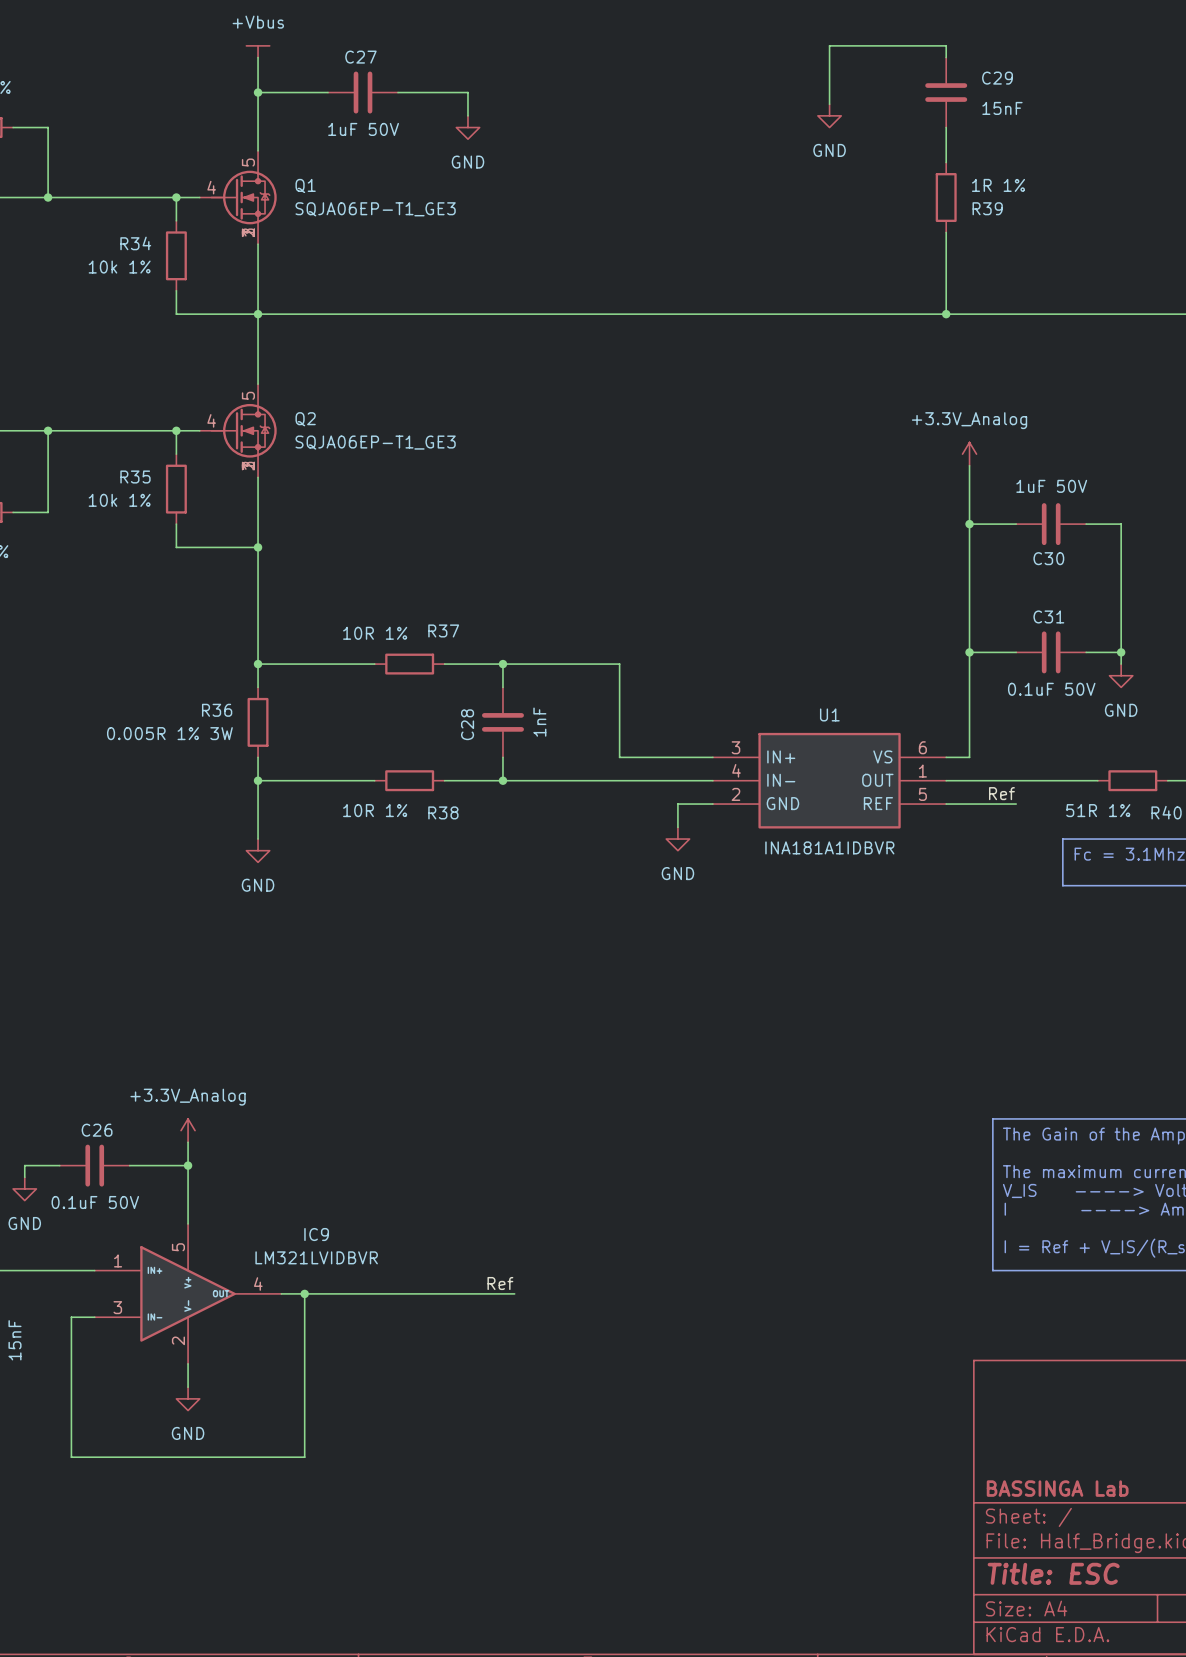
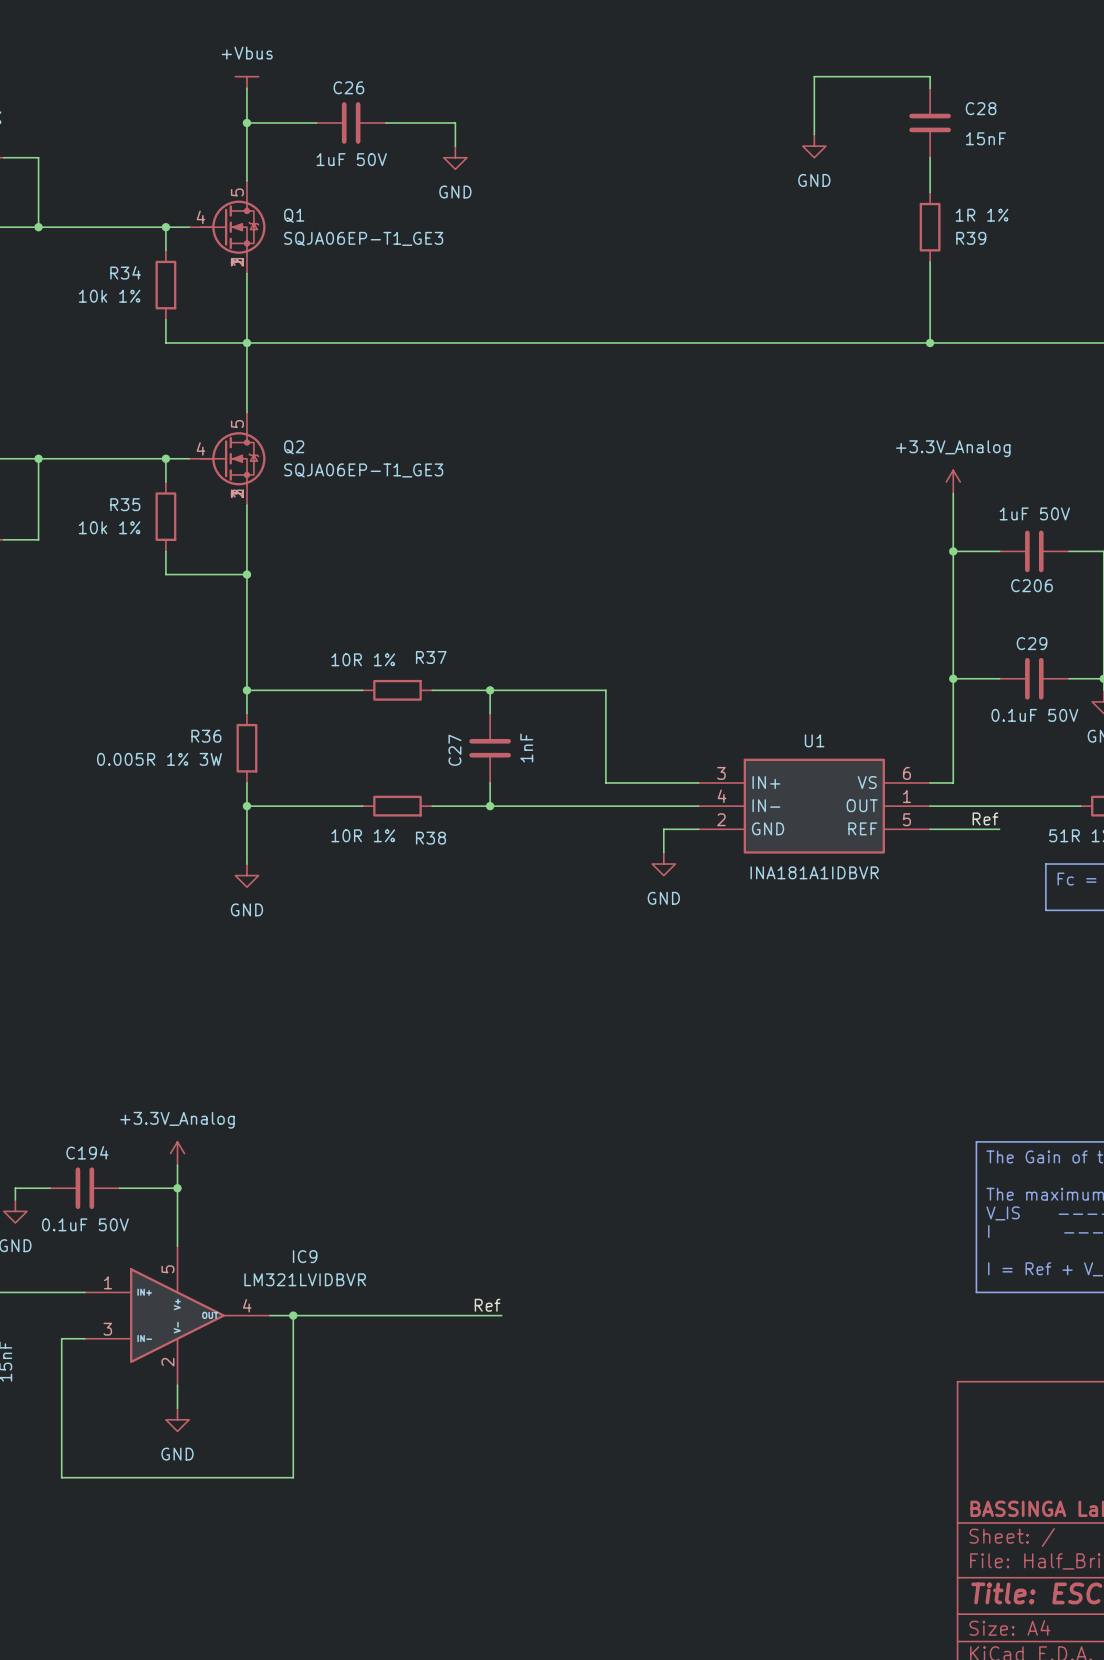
C27 name: C27 (360, 57) -> C26 (348, 87)
C29 name: C29 (997, 78) -> C28 (981, 108)
C30 name: C30 (1048, 558) -> C206 (1032, 585)
C31 name: C31 (1048, 616) -> C29 (1032, 643)
C28 name: C28 (467, 724) -> C27 (454, 750)
C26 name: C26 (97, 1130) -> C194 (87, 1152)

